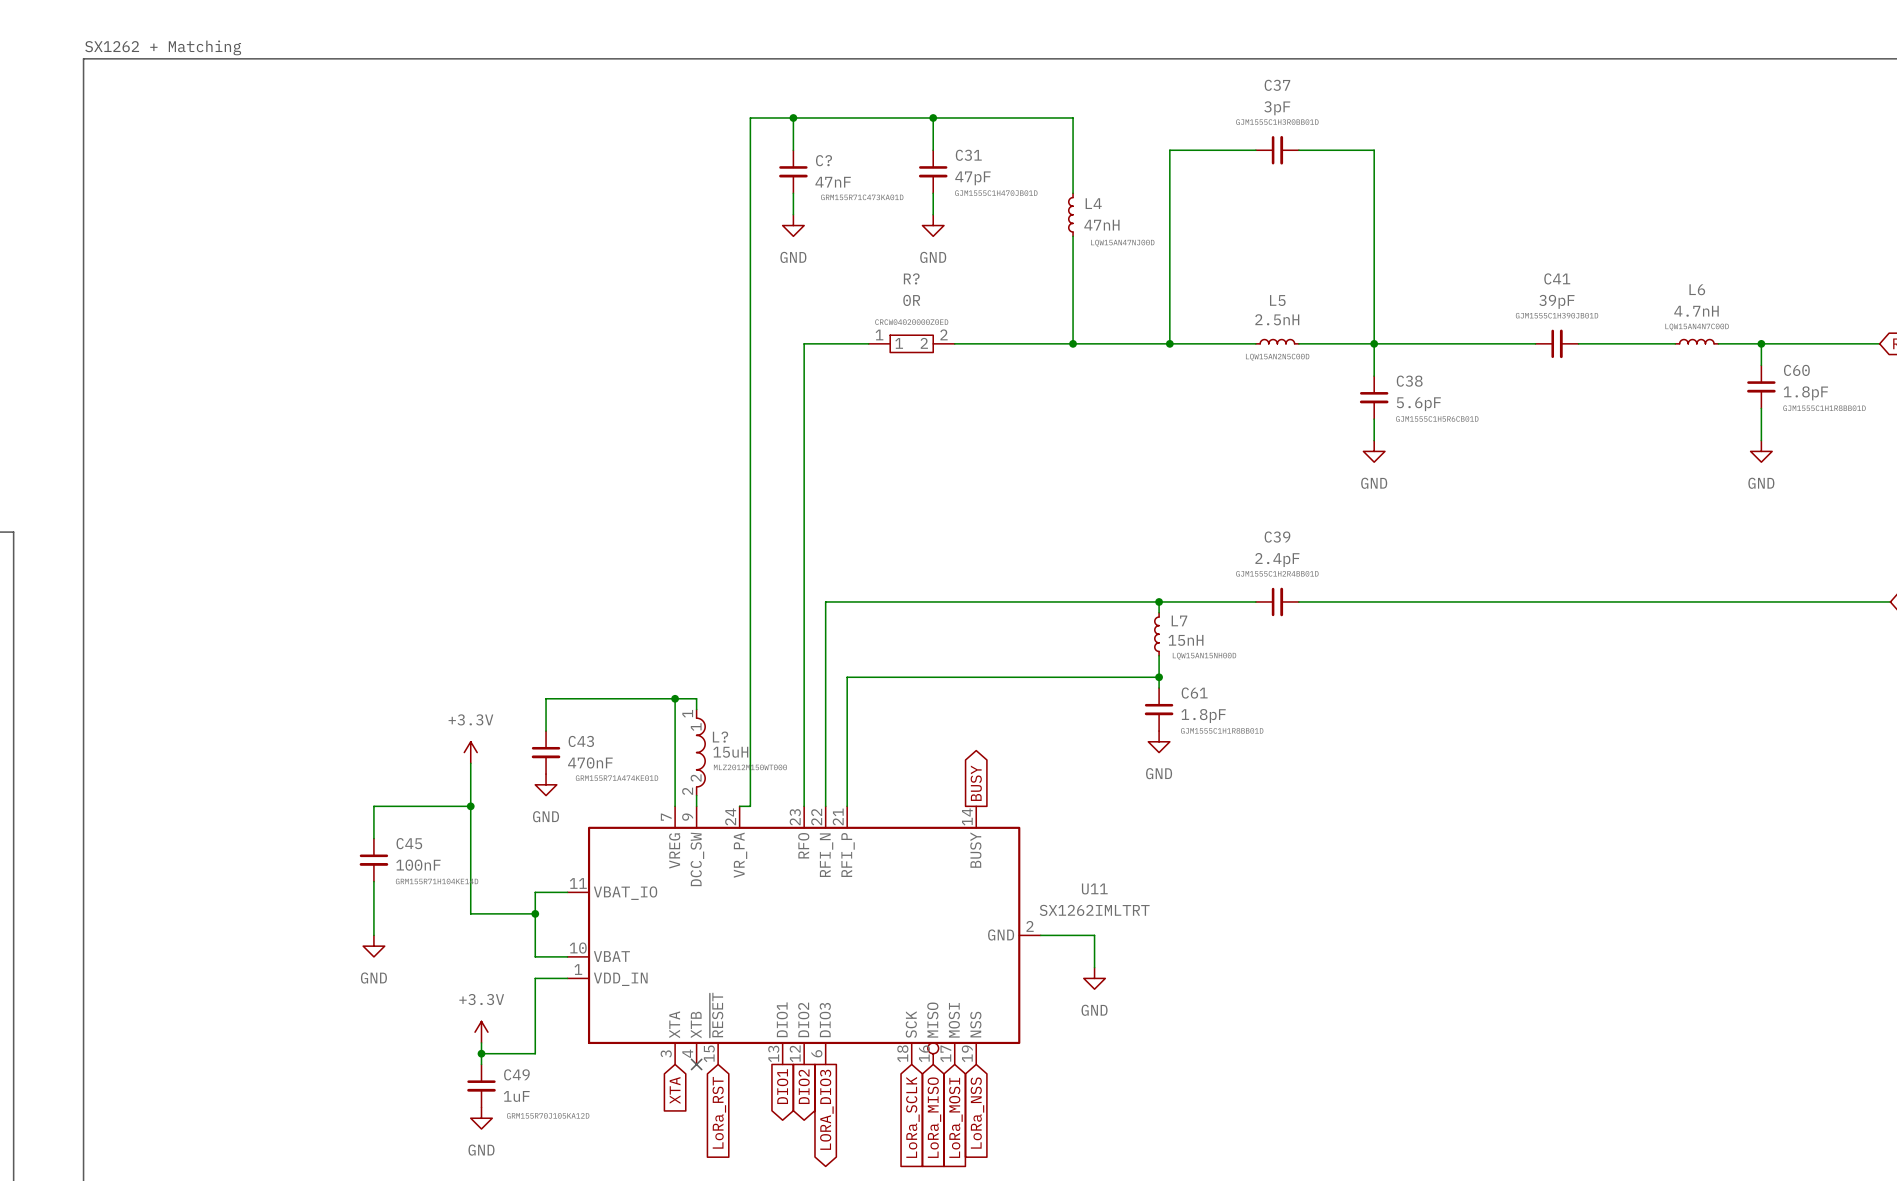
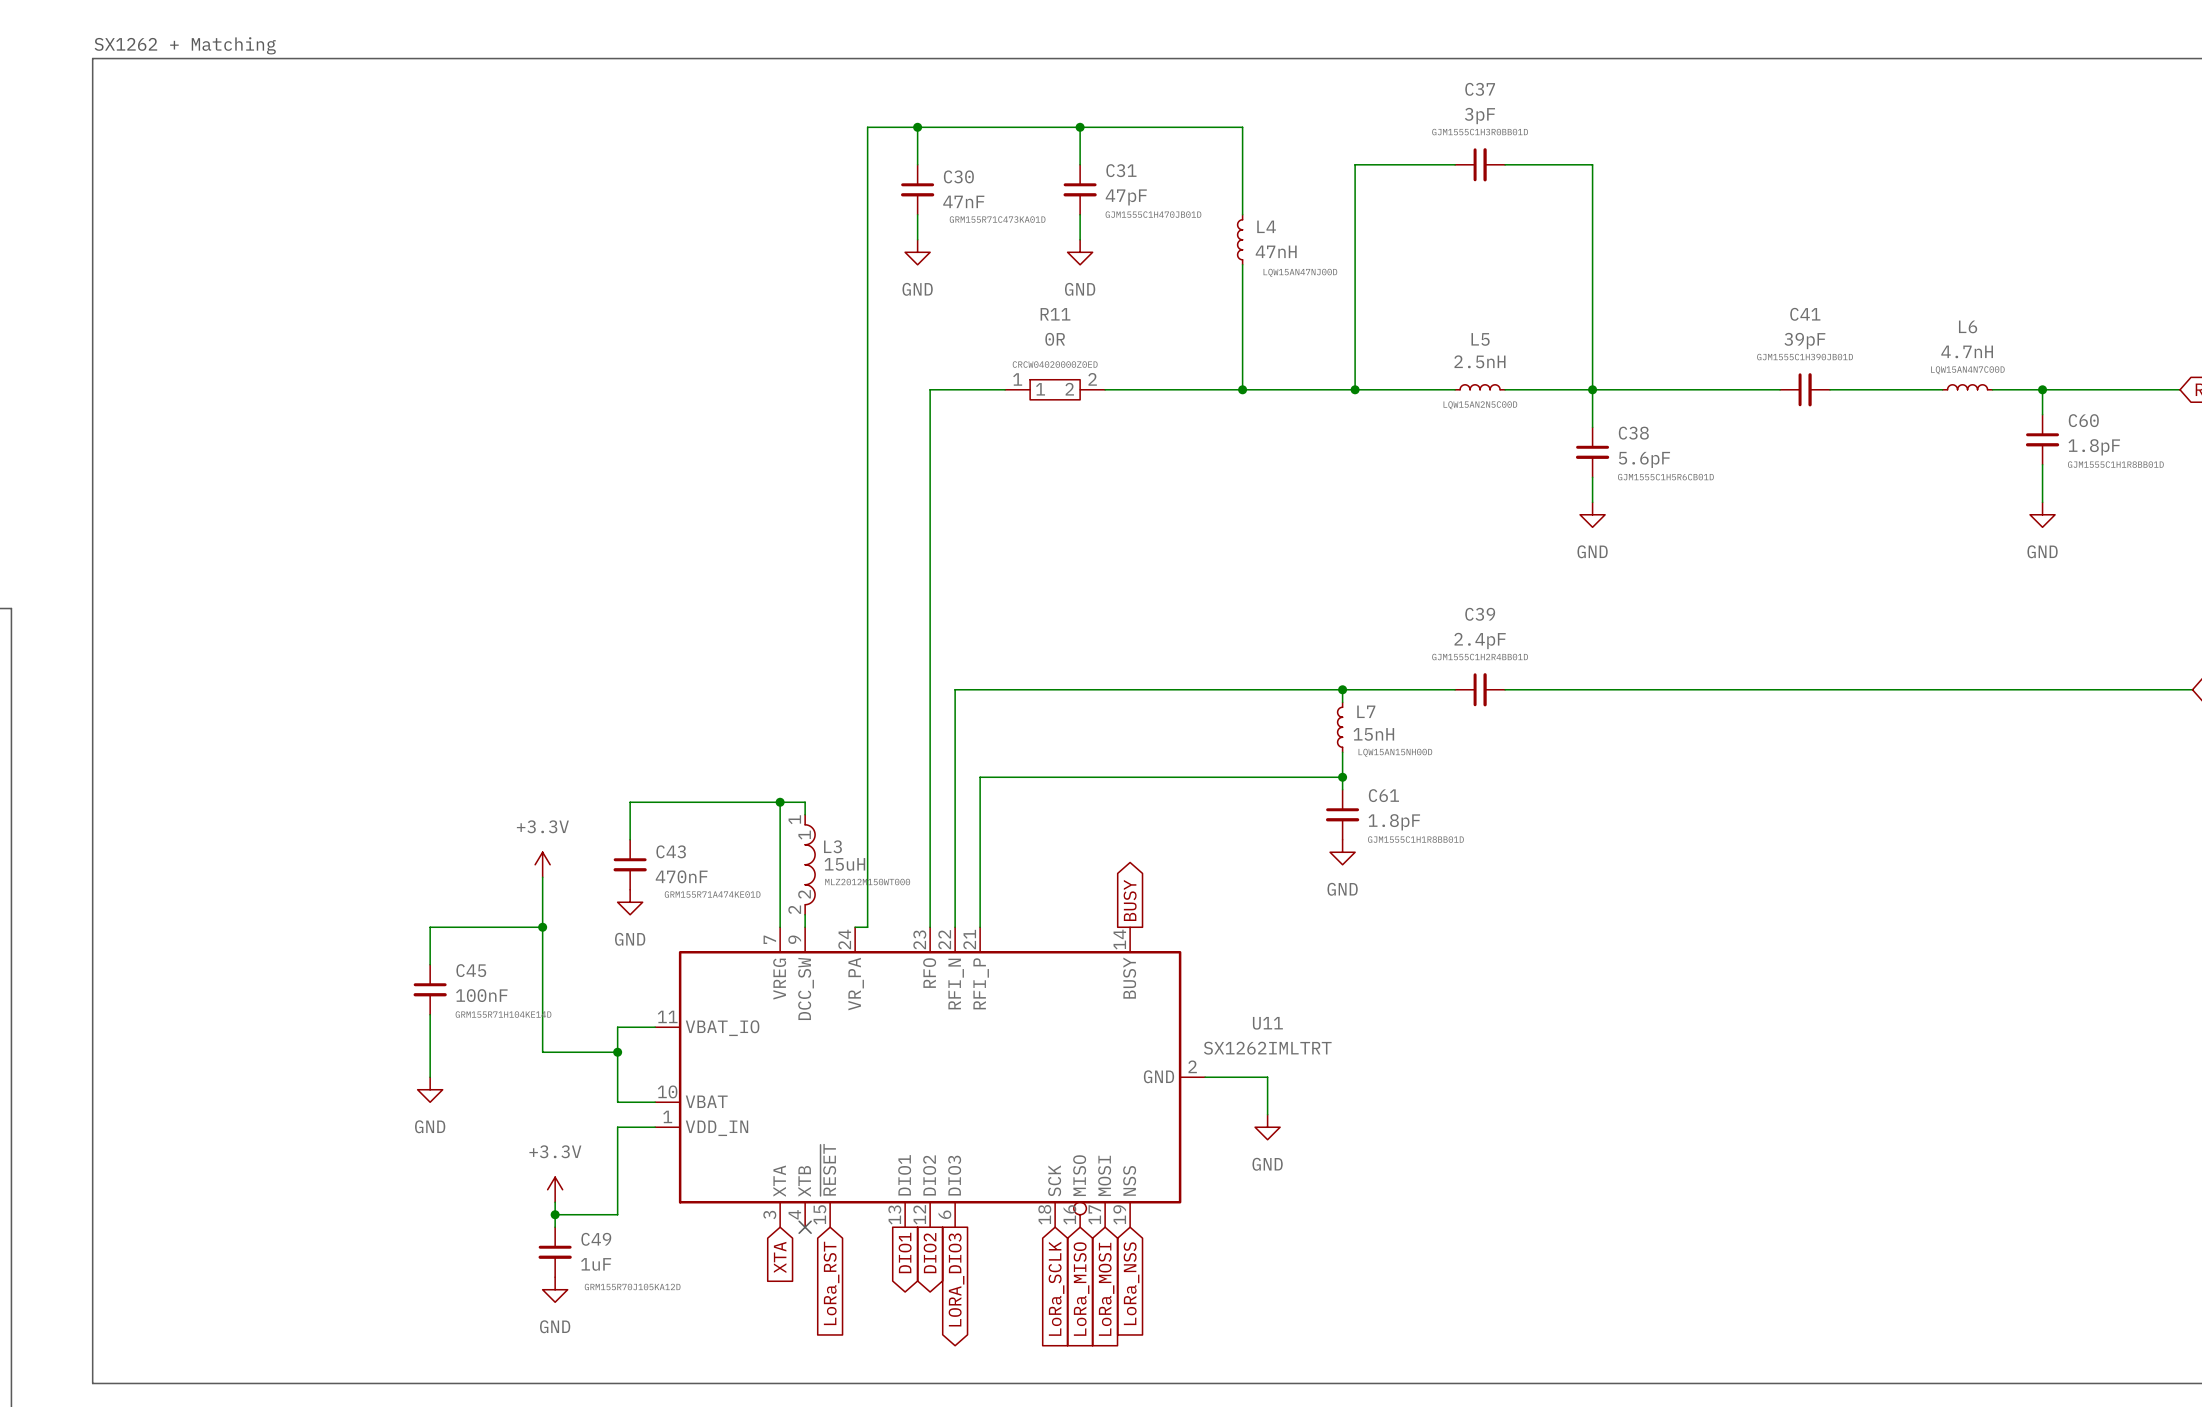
C? name: C? (824, 160) -> C30 (958, 176)
R? name: R? (911, 278) -> R11 (1055, 314)
L? name: L? (720, 737) -> L3 (832, 846)

